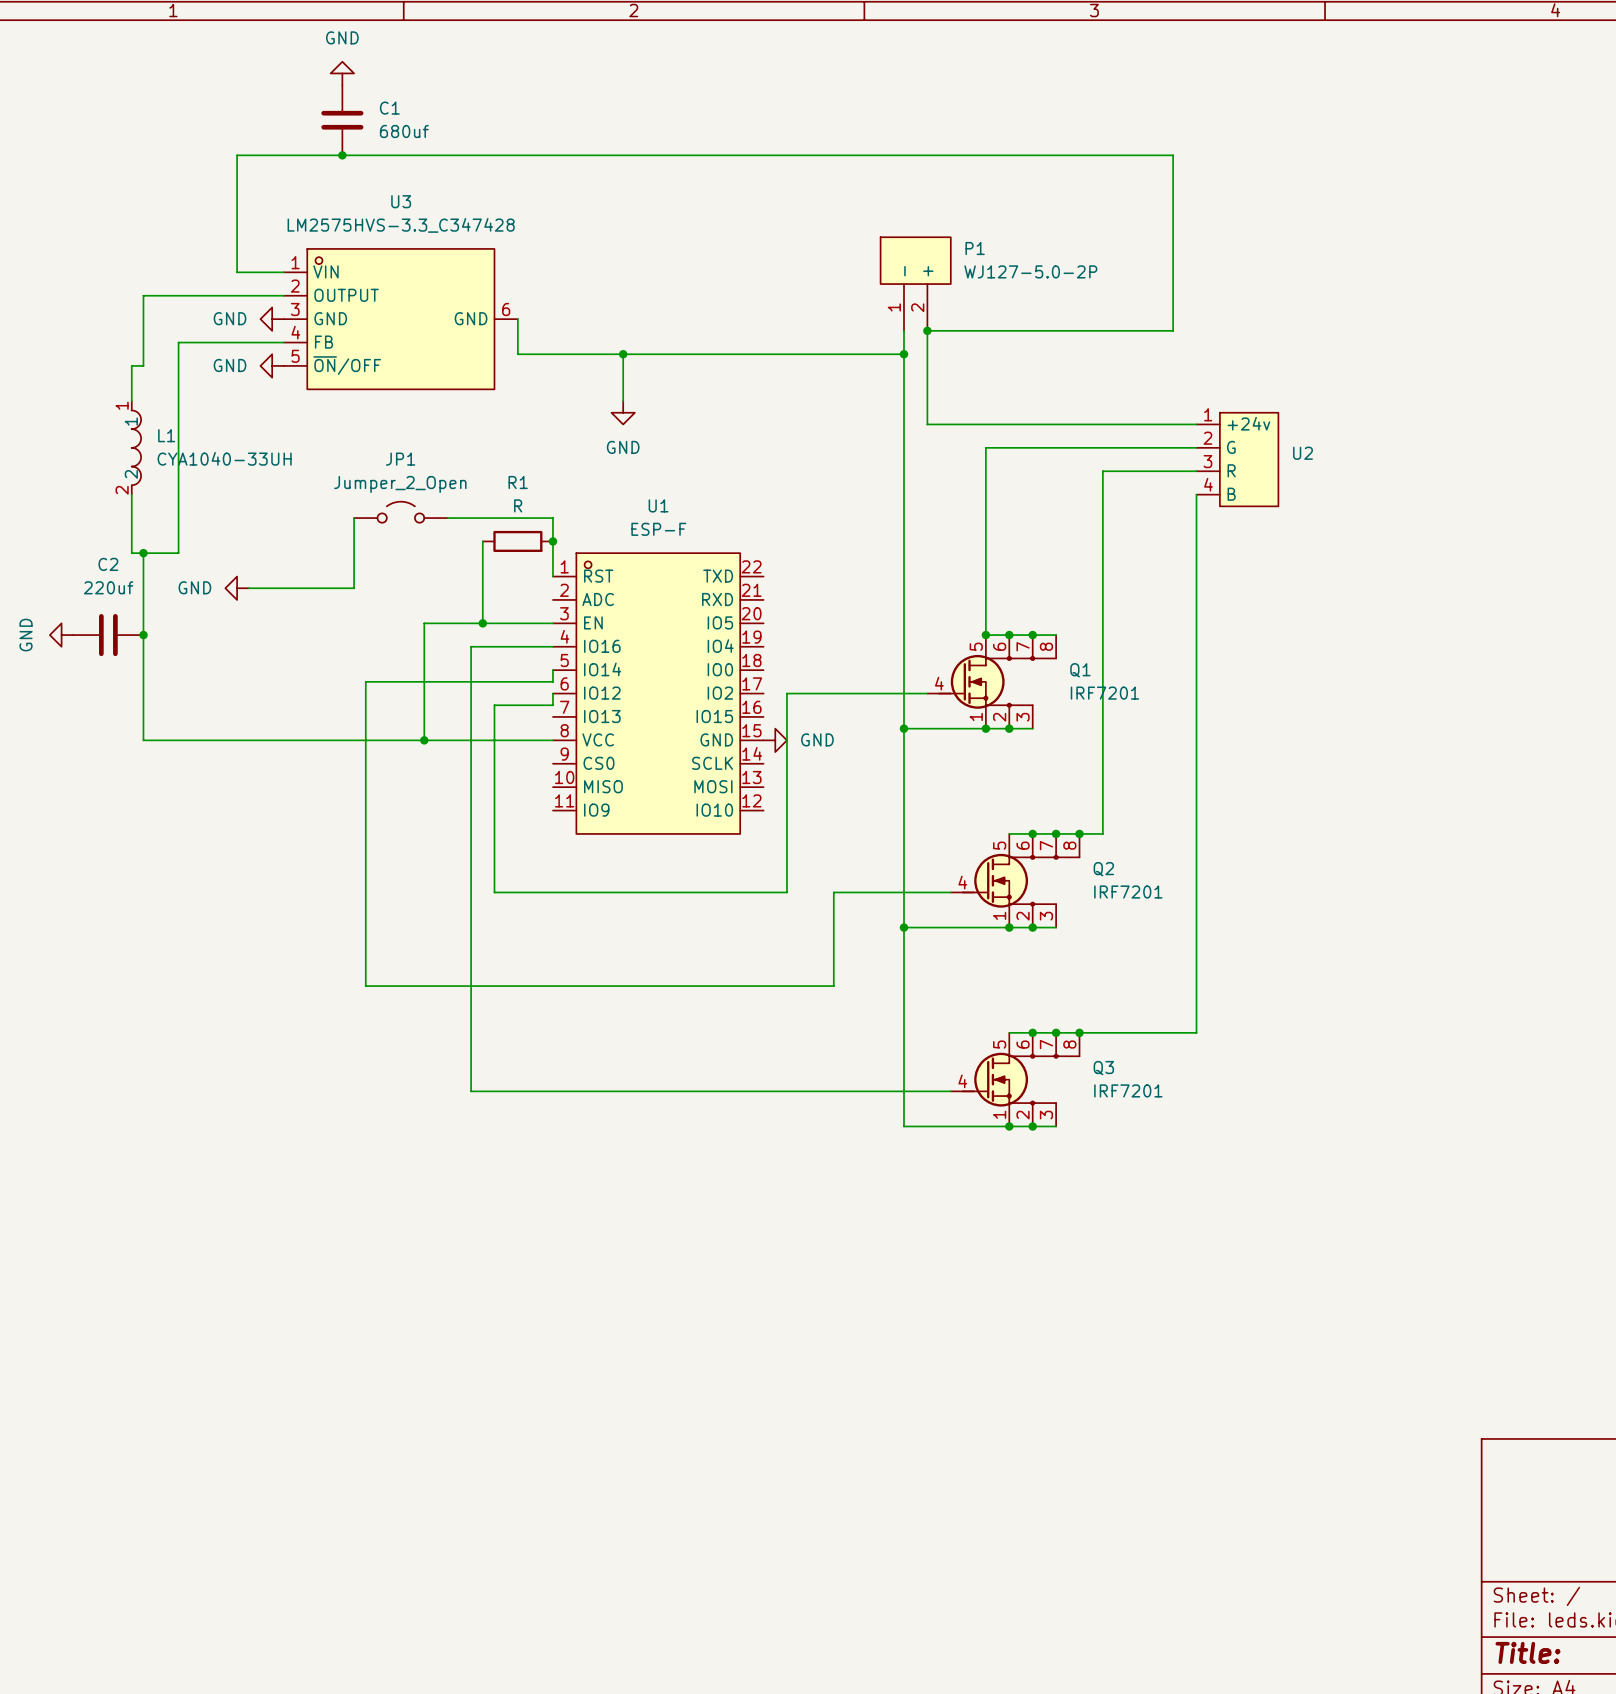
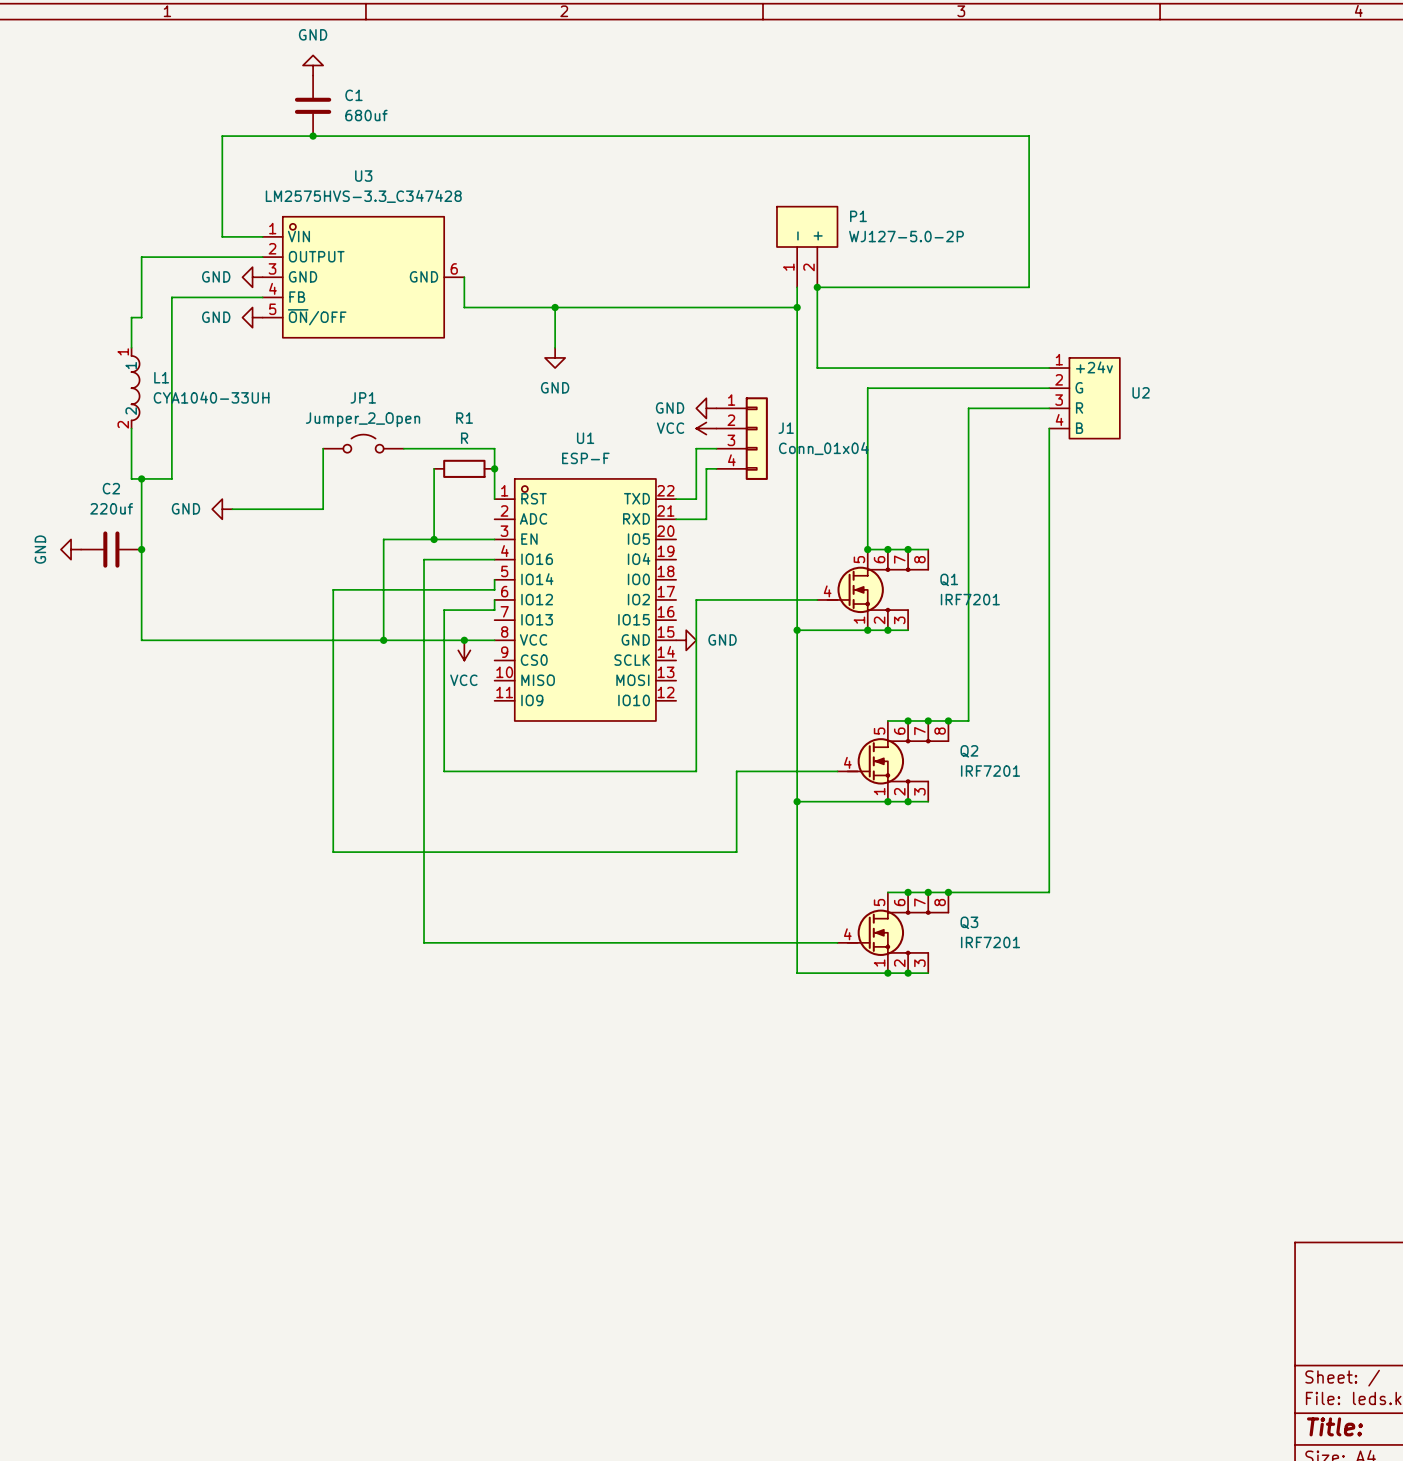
power symbol: none -> GND (706, 408)
power symbol: none -> VCC (706, 428)
J1: none -> Conn_01x04 (742, 438)
wire: none -> (716, 448) (696, 448) (696, 499) (676, 499)
wire: none -> (716, 468) (706, 468) (706, 519) (676, 519)
junction: none -> (464, 640)
power symbol: none -> VCC (464, 650)

